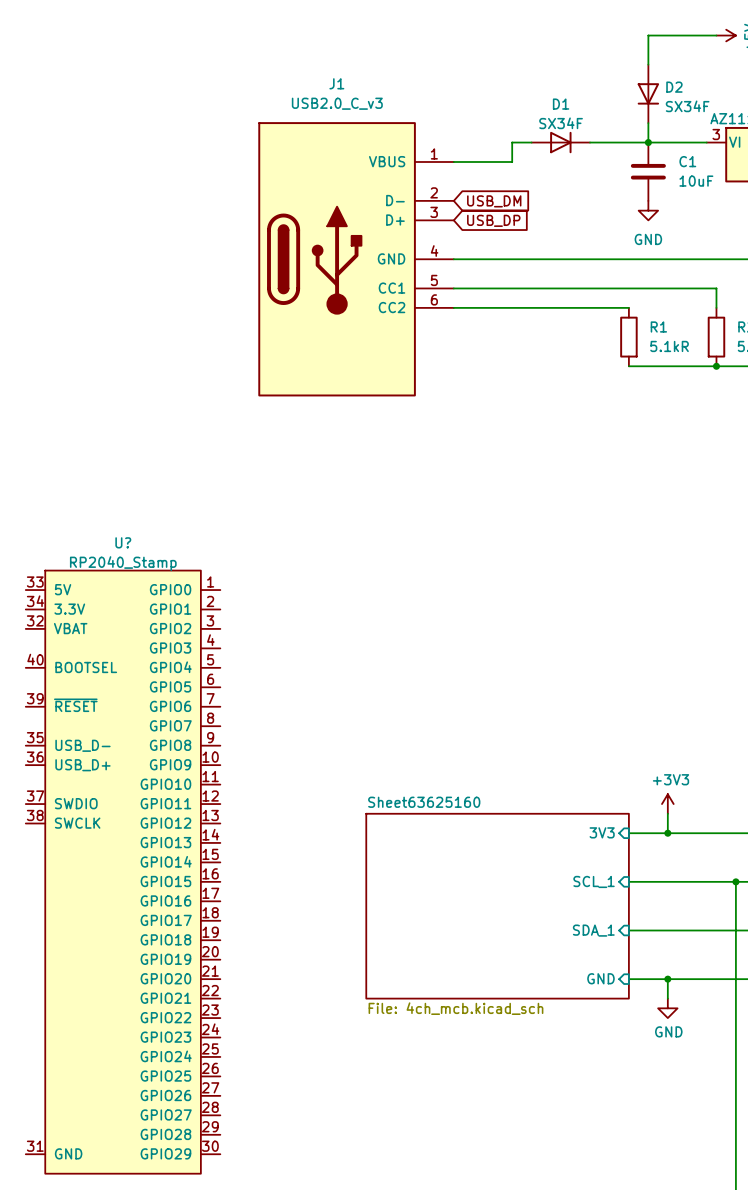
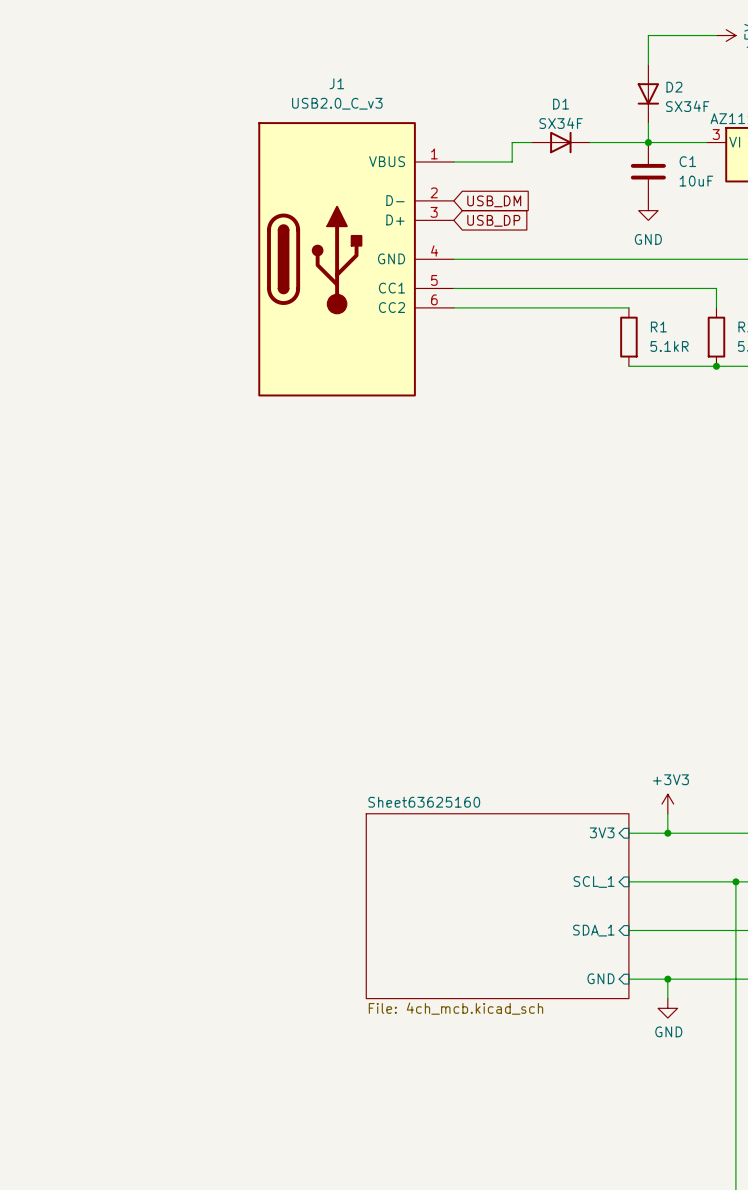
U?: RP2040_Stamp (123, 872) -> none

